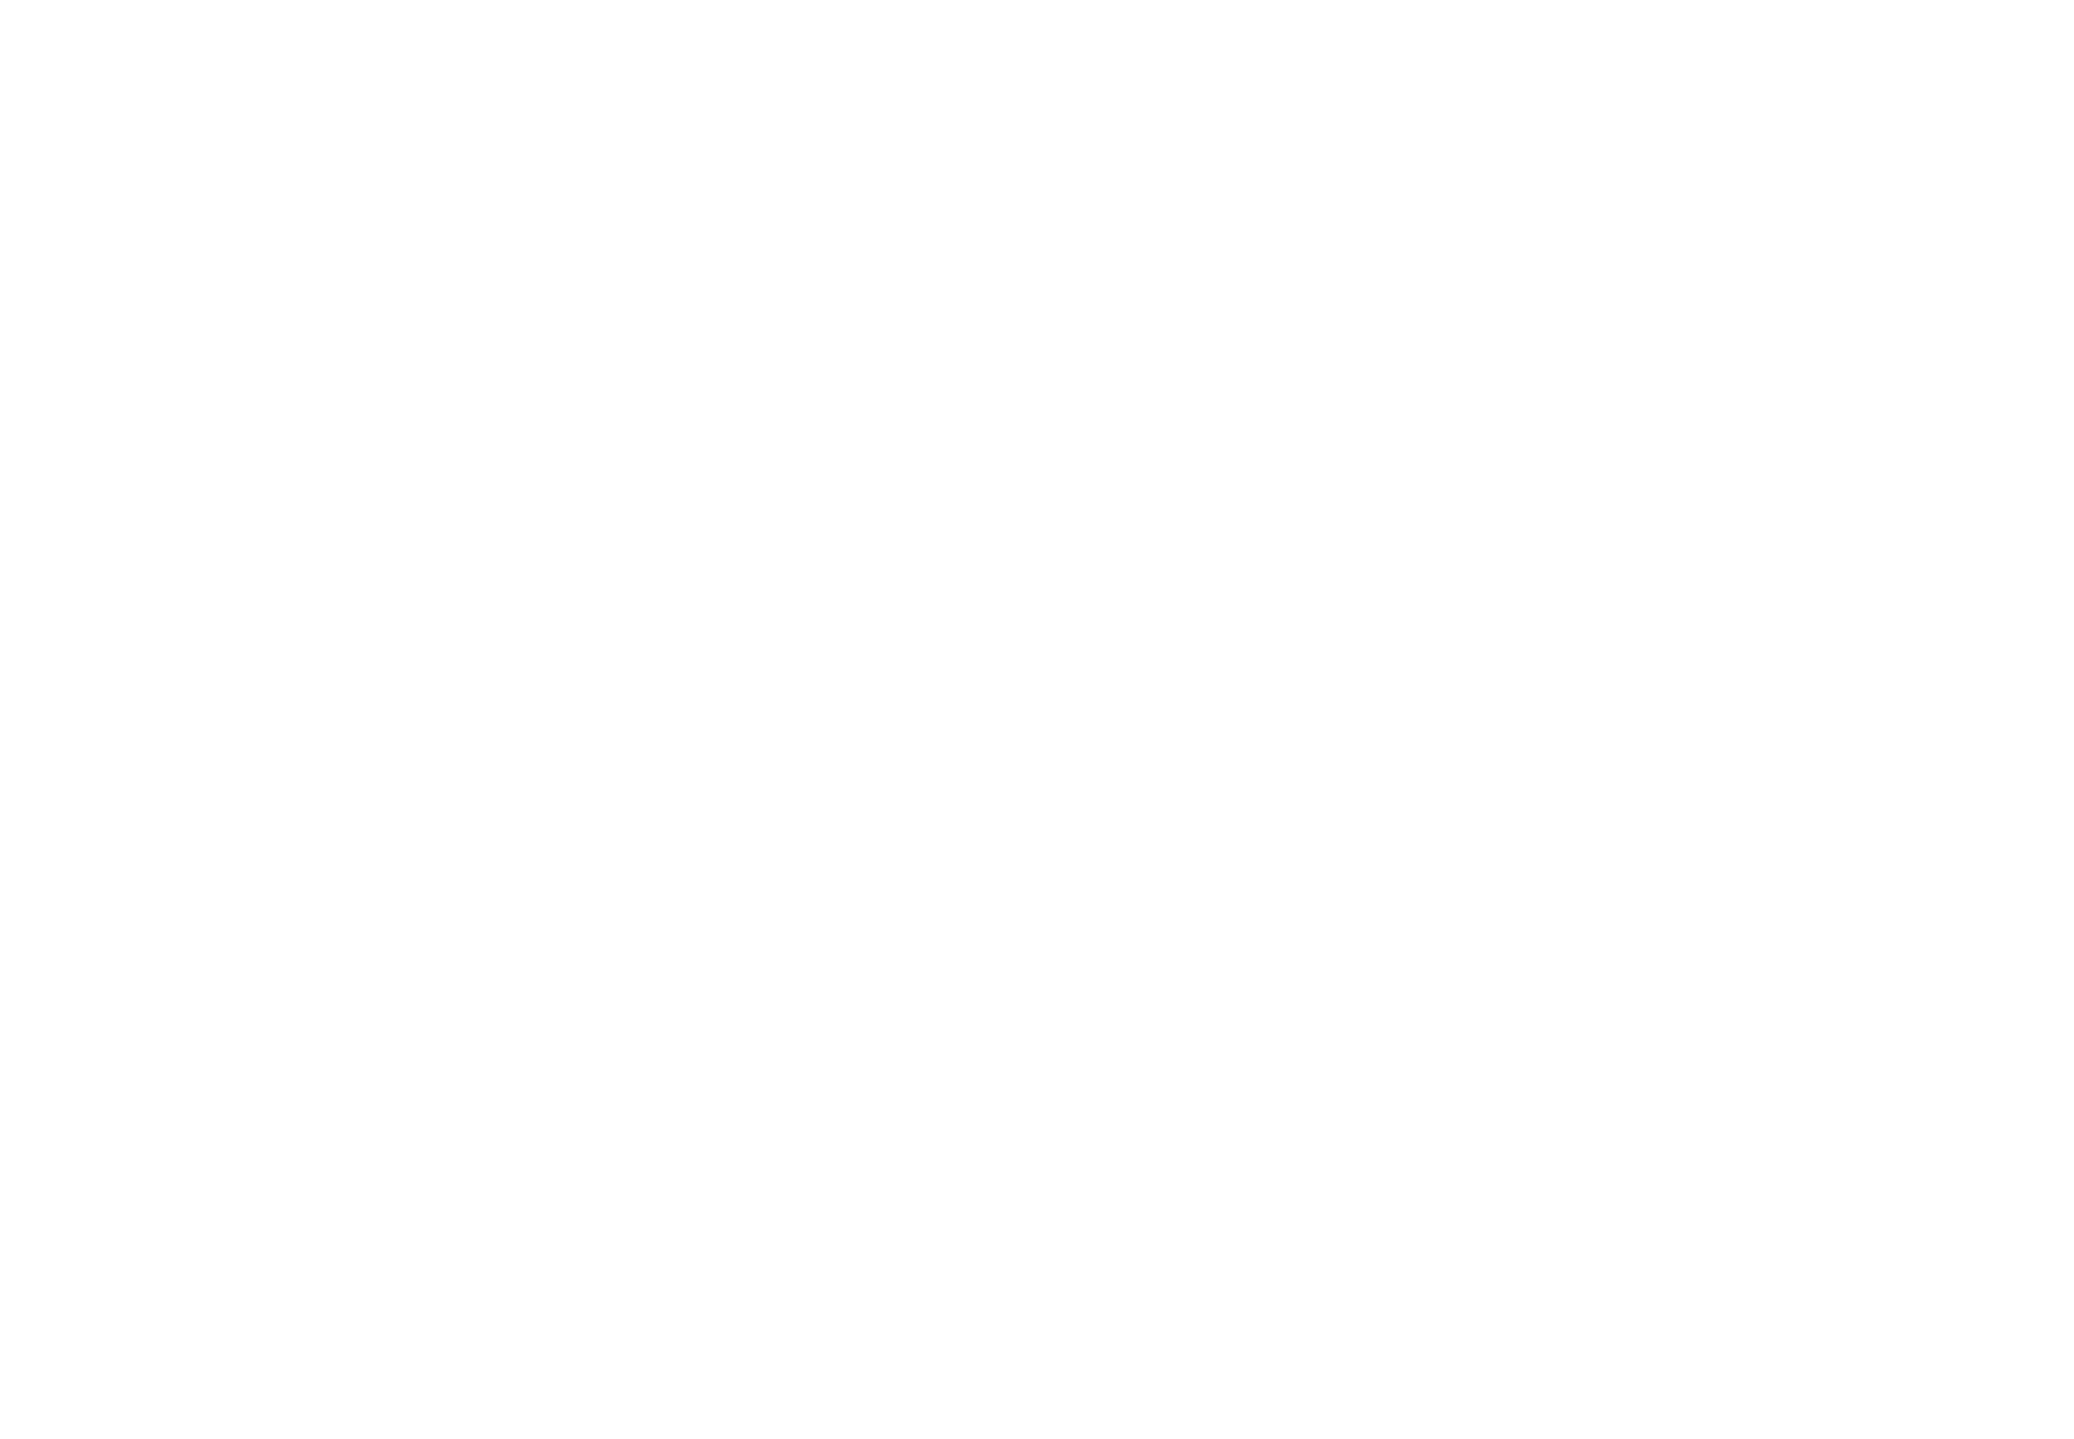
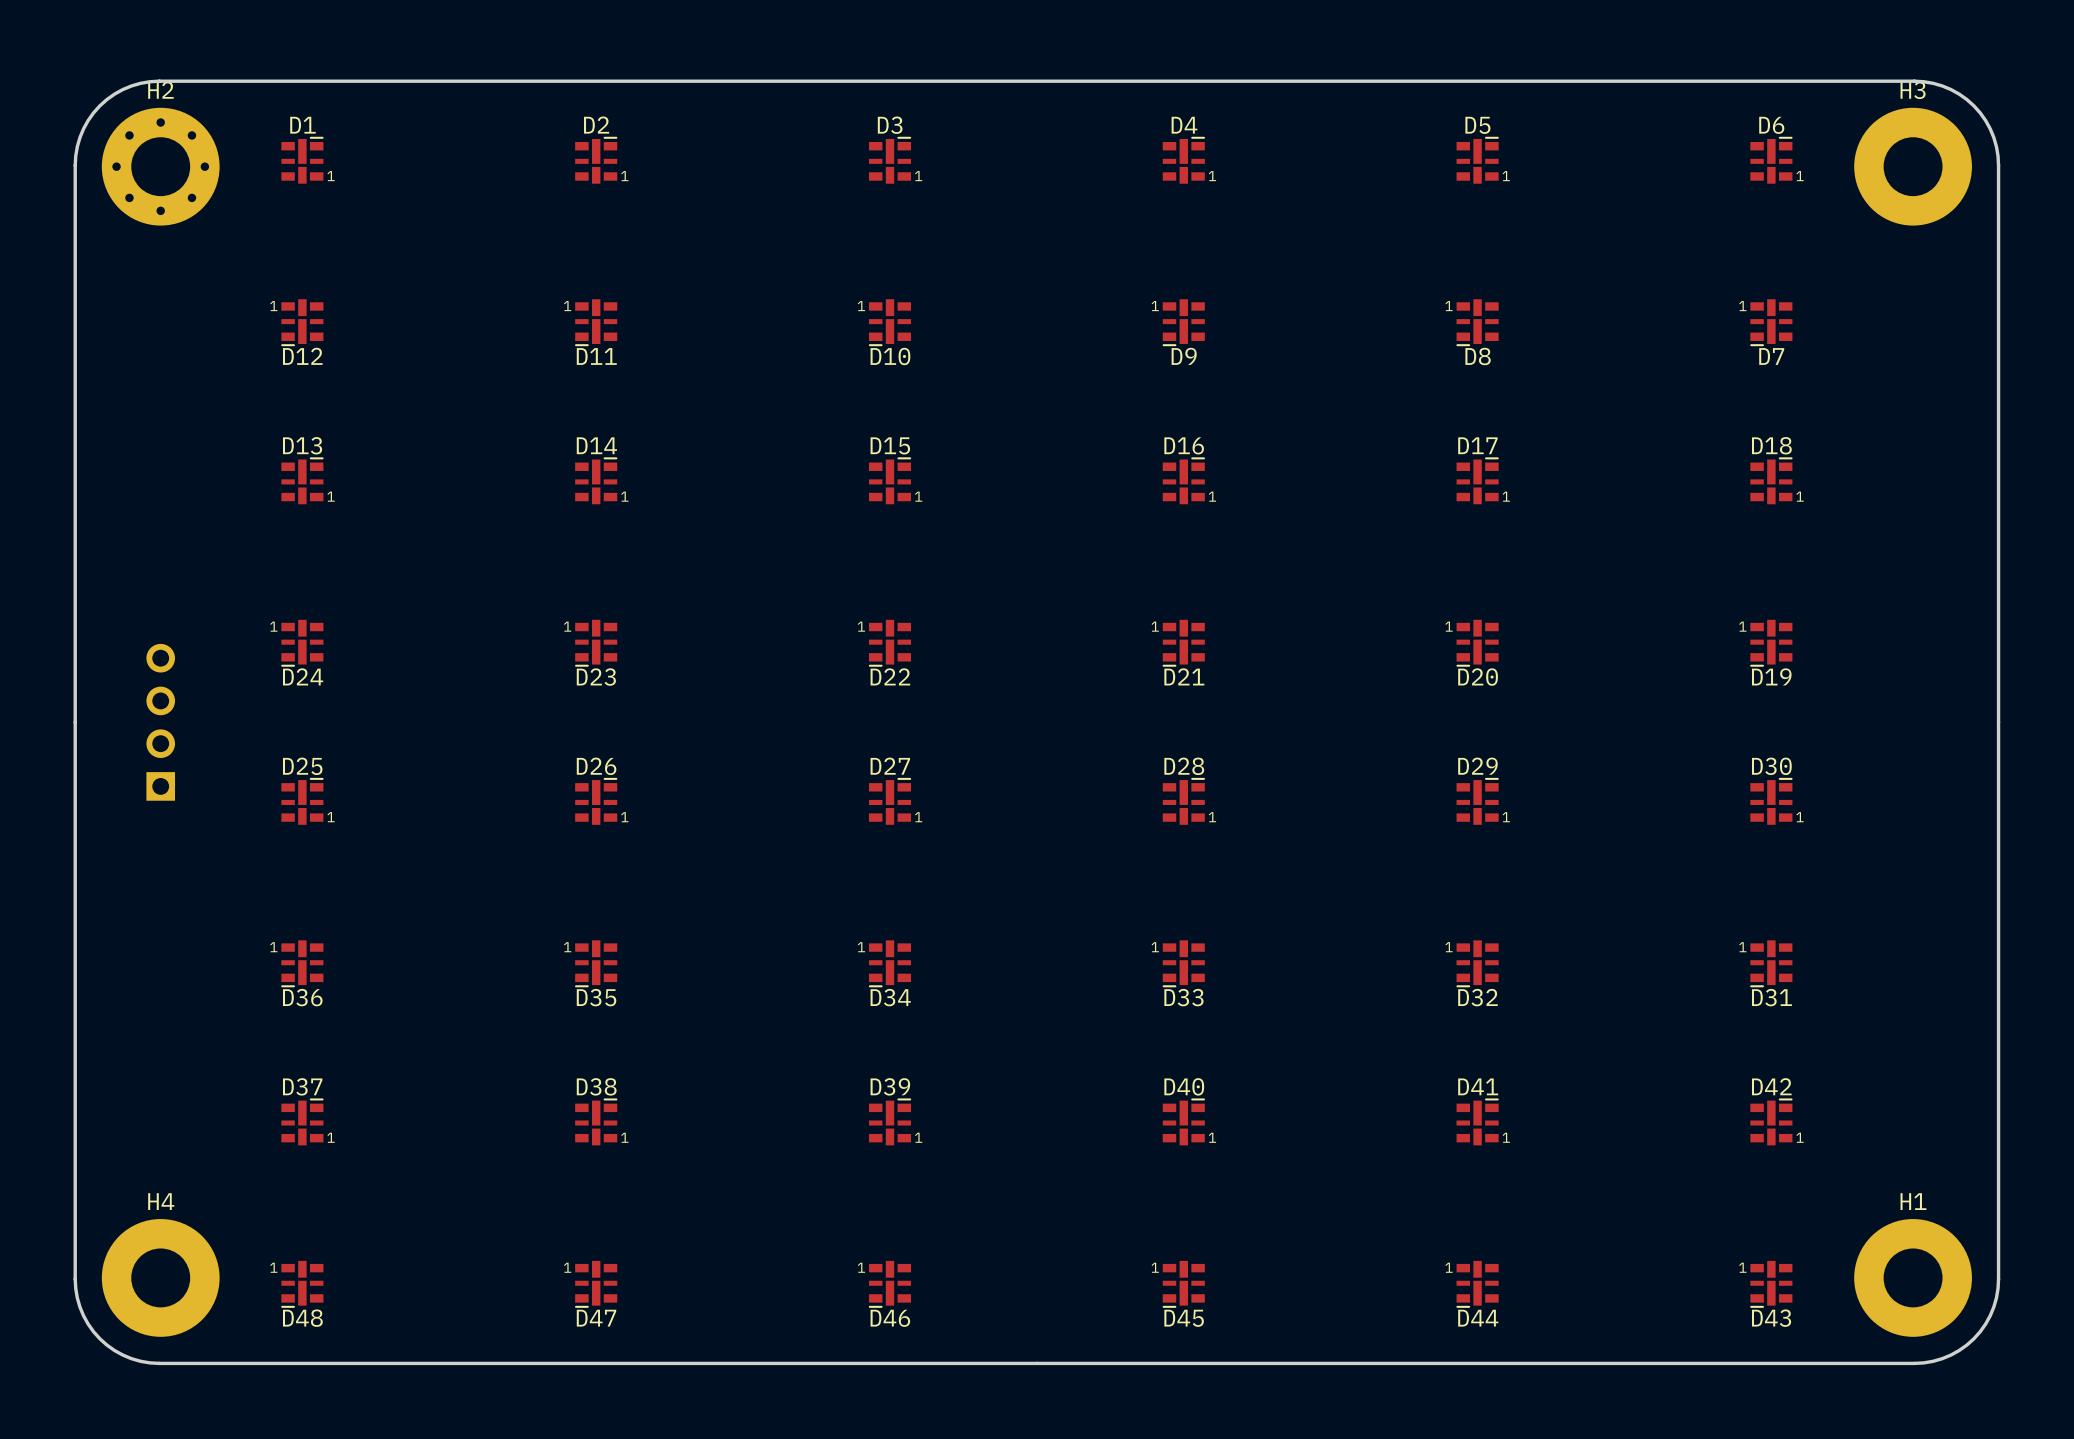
board edge: none -> (159, 81) (1914, 81) (1942, 85) (1959, 94) (1973, 105) (1990, 128) (1996, 146) (1998, 165) (1998, 1279) (1996, 1298) (1985, 1324) (1966, 1345) (1950, 1355) (1933, 1361) (1914, 1363) (159, 1363) (131, 1358) (114, 1350) (99, 1338) (88, 1324) (79, 1307) (75, 1279) (75, 165) (79, 137) (88, 120) (99, 105) (114, 94) (131, 85) (159, 81)
D1: none -> (302, 160)
D2: none -> (596, 160)
D3: none -> (890, 160)
D4: none -> (1183, 160)
D5: none -> (1477, 160)
D6: none -> (1771, 160)
H2: none -> (160, 166)
H3: none -> (1913, 166)
D12: none -> (302, 322)
D11: none -> (596, 322)
D10: none -> (889, 322)
D9: none -> (1183, 322)
D8: none -> (1477, 322)
D7: none -> (1771, 322)
D13: none -> (302, 480)
D14: none -> (596, 480)
D15: none -> (890, 480)
D16: none -> (1183, 480)
D17: none -> (1477, 480)
D18: none -> (1771, 480)
D24: none -> (302, 643)
D23: none -> (596, 643)
D22: none -> (889, 643)
D21: none -> (1183, 643)
D20: none -> (1477, 643)
D19: none -> (1771, 643)
part: none -> (160, 722)
D25: none -> (302, 801)
D26: none -> (596, 801)
D27: none -> (890, 801)
D28: none -> (1183, 801)
D29: none -> (1477, 801)
D30: none -> (1771, 801)
D36: none -> (302, 963)
D35: none -> (596, 963)
D34: none -> (889, 963)
D33: none -> (1183, 963)
D32: none -> (1477, 963)
D31: none -> (1771, 963)
D37: none -> (302, 1121)
D38: none -> (596, 1121)
D39: none -> (890, 1121)
D40: none -> (1183, 1121)
D41: none -> (1477, 1121)
D42: none -> (1771, 1121)
H4: none -> (160, 1277)
H1: none -> (1913, 1277)
D48: none -> (302, 1284)
D47: none -> (596, 1284)
D46: none -> (889, 1284)
D45: none -> (1183, 1284)
D44: none -> (1477, 1284)
D43: none -> (1771, 1284)

